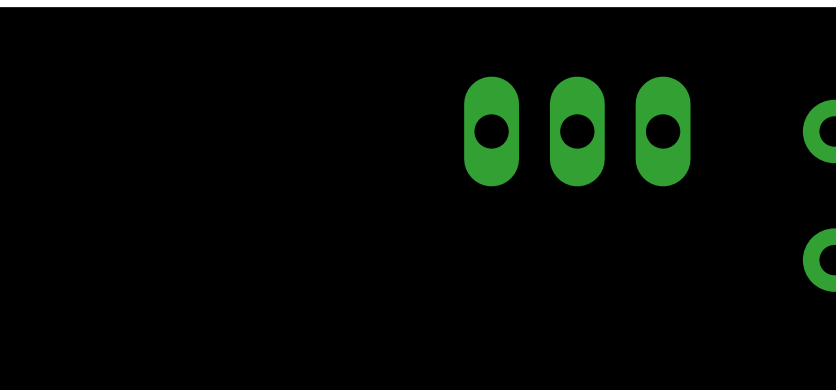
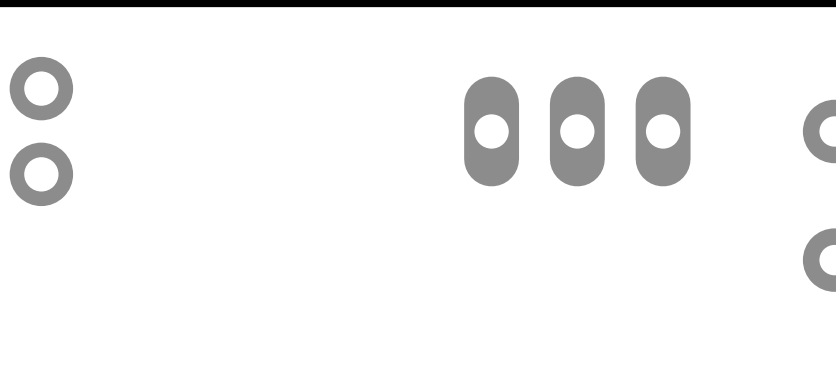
part: none -> (41, 131)

